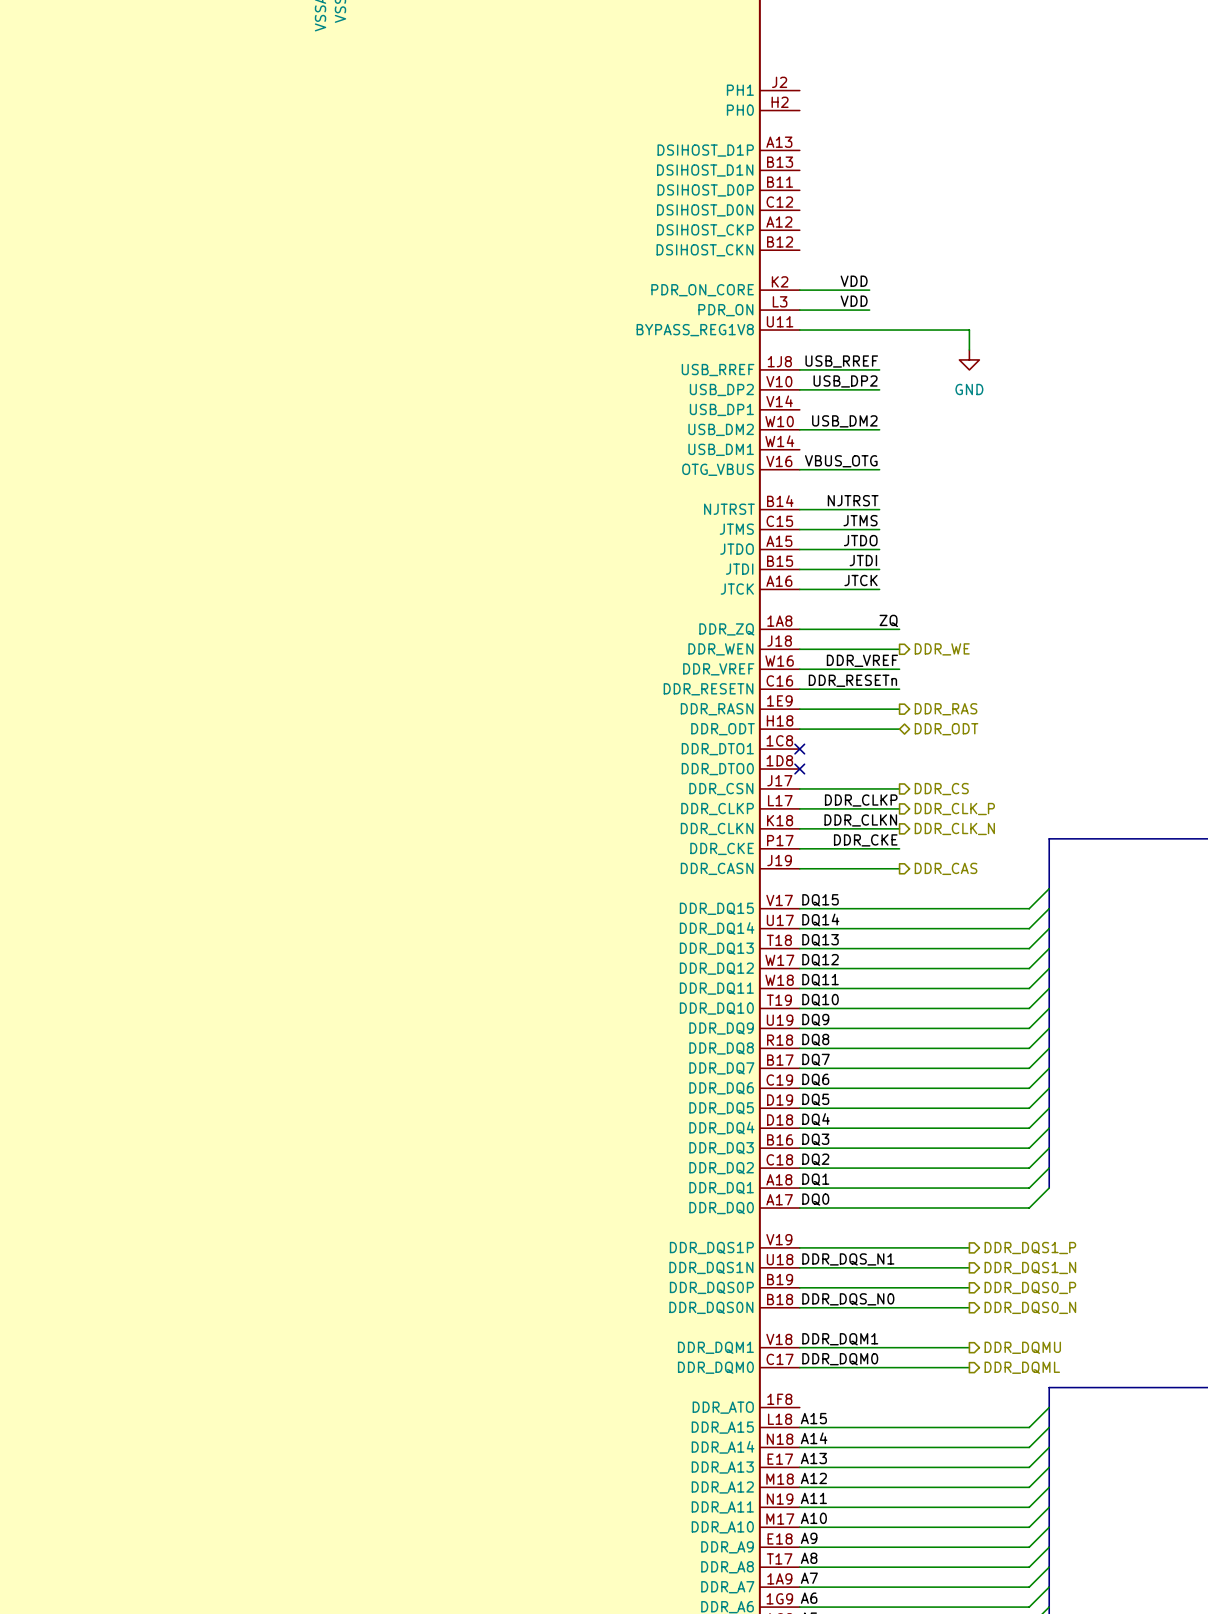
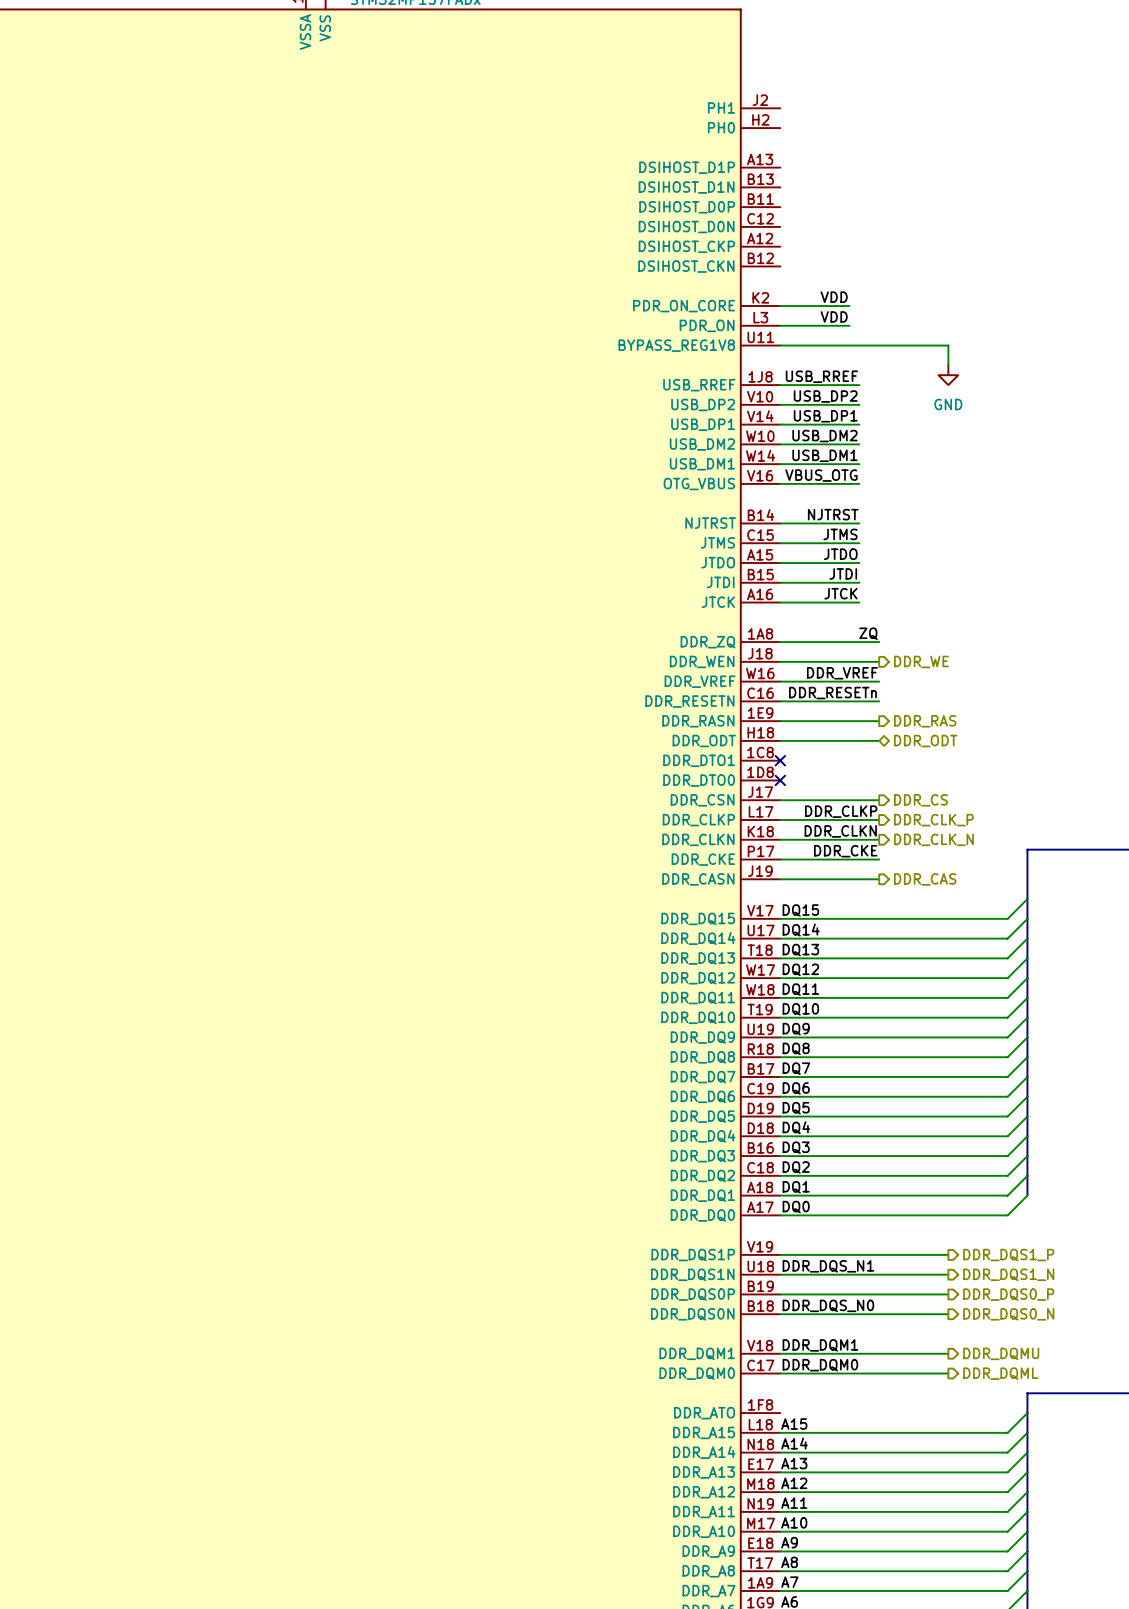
label: none -> USB_DP1 (825, 416)
wire: none -> (780, 424) (859, 424)
label: none -> USB_DM1 (824, 455)
wire: none -> (780, 464) (859, 464)

